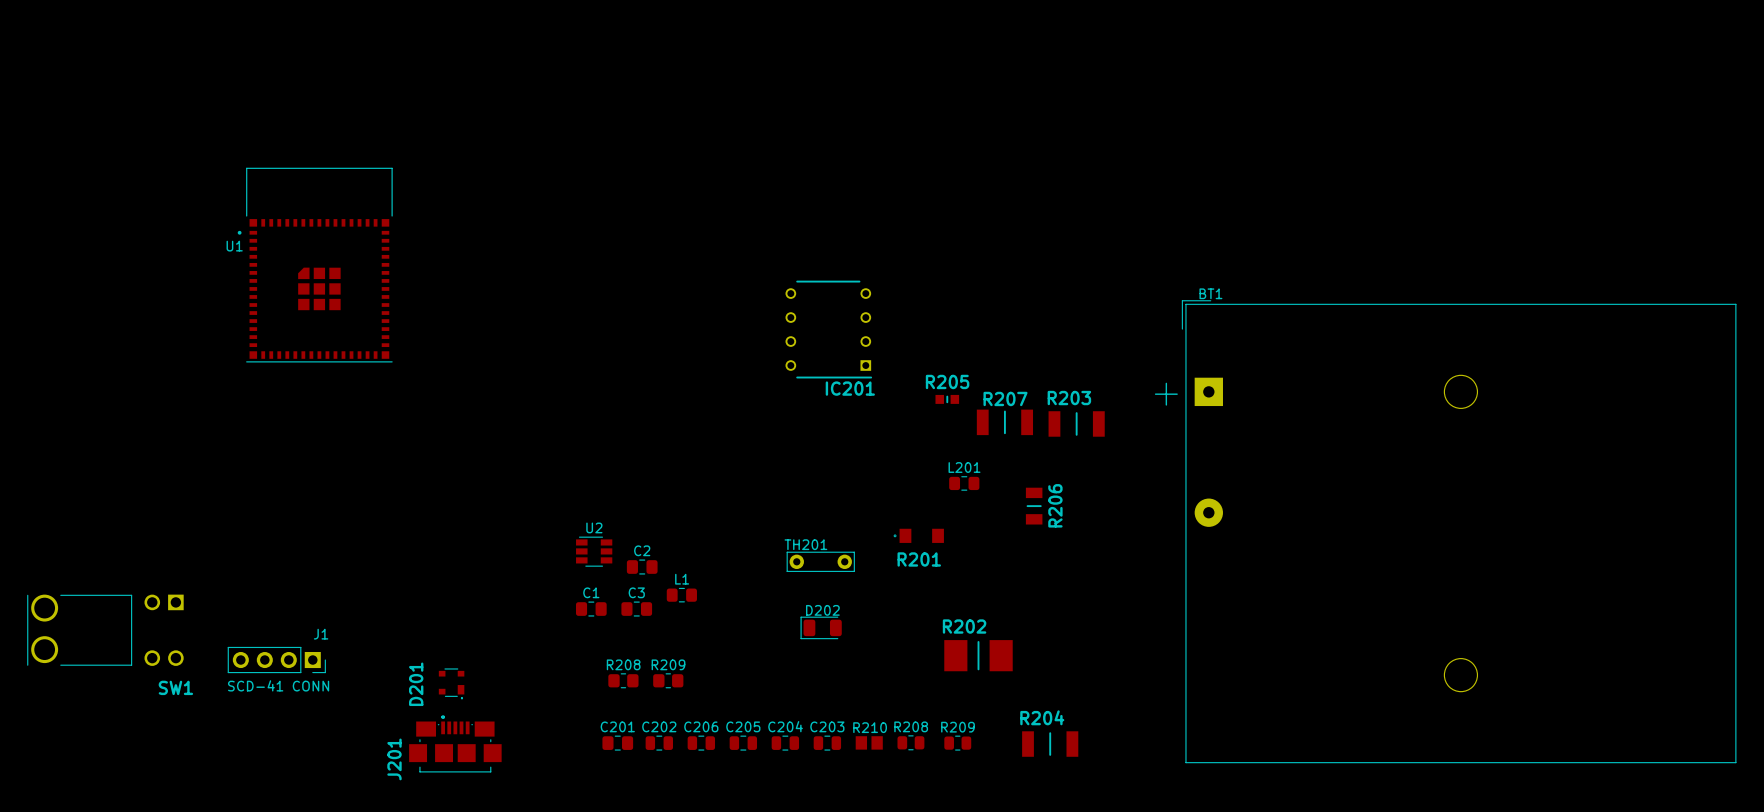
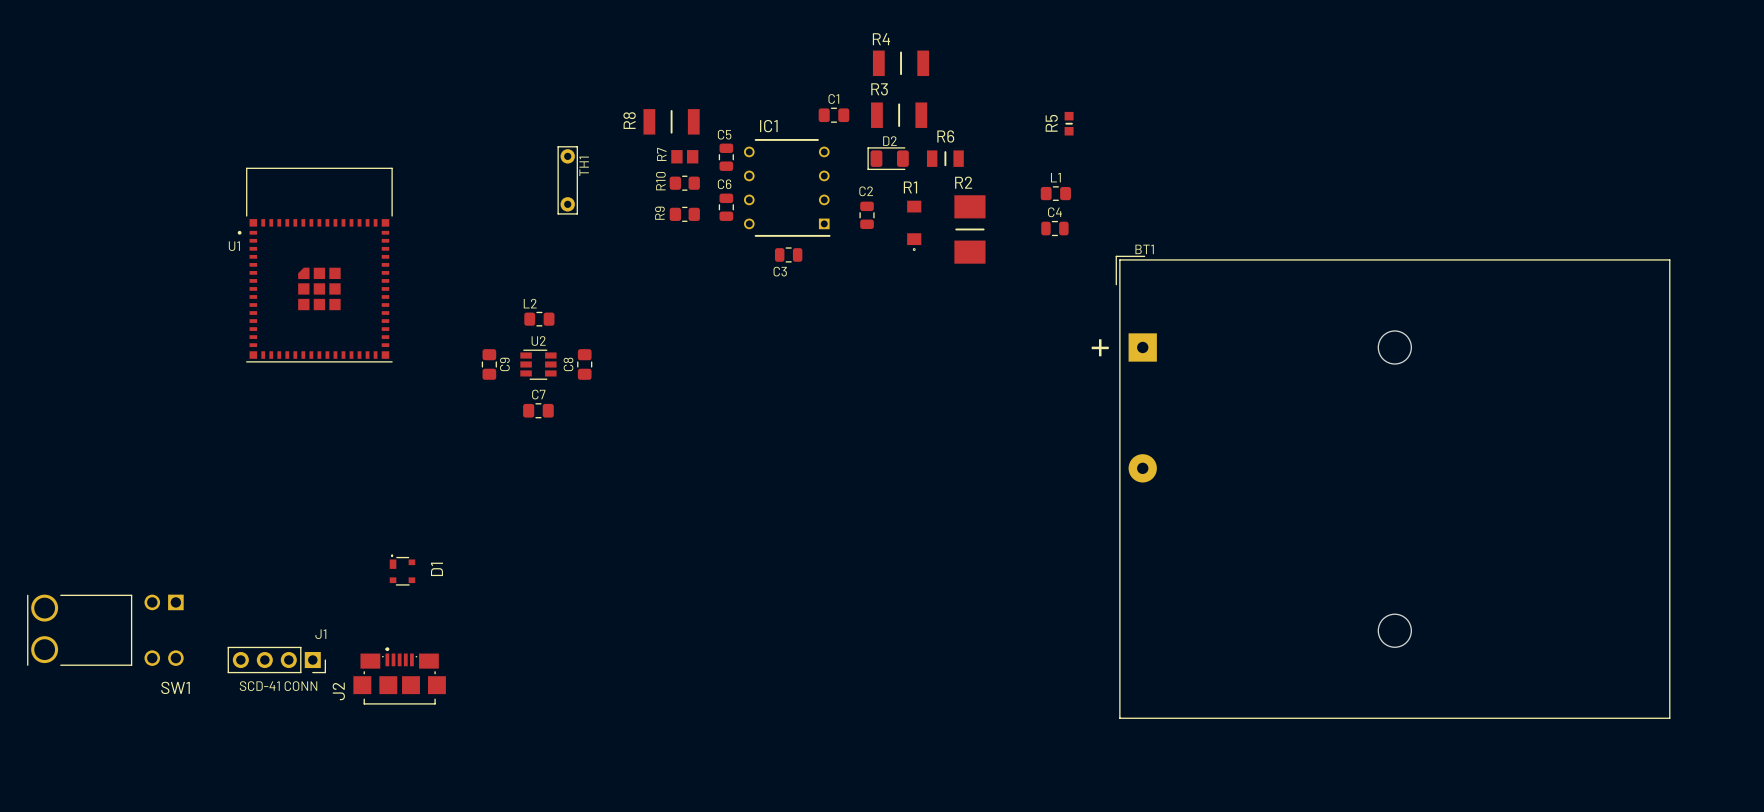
R4: none -> (901, 63)
R3: none -> (899, 115)
R8: none -> (671, 121)
R5: none -> (1069, 123)
R7: none -> (684, 156)
C5: none -> (726, 157)
D2: none -> (888, 158)
R6: none -> (945, 158)
TH1: none -> (567, 180)
R10: none -> (684, 183)
IC1: none -> (787, 187)
C6: none -> (726, 207)
R9: none -> (684, 214)
R1: none -> (914, 225)
C4: none -> (1054, 228)
R2: none -> (969, 229)
L2: none -> (539, 319)
IC201: (828, 329) -> none
C9: none -> (489, 364)
C8: none -> (584, 364)
R205: (947, 399) -> none
C7: none -> (538, 410)
R207: (1004, 422) -> none
R203: (1076, 423) -> none
L201: (964, 483) -> none
R206: (1034, 506) -> none
BT1 position: (1459, 531) -> (1393, 487)
R201: (918, 535) -> none
U2 position: (594, 551) -> (538, 364)
C2 footprint: [626, 559, 658, 575] -> [859, 201, 875, 229]
TH201: (820, 561) -> none
D1: none -> (402, 570)
C3 name position: C3 (636, 592) -> C3 (780, 271)
L1 position: (681, 595) -> (1055, 193)
C3 footprint: [621, 601, 653, 617] -> [774, 247, 803, 263]
C1 position: (591, 609) -> (833, 115)
D202: (821, 627) -> none
R202: (978, 655) -> none
J2: none -> (399, 675)
R208: (623, 680) -> none
R209: (668, 680) -> none
D201: (451, 683) -> none
R210: (869, 742) -> none
R208: (910, 742) -> none
J201: (455, 743) -> none
C201: (617, 743) -> none
C202: (659, 743) -> none
C206: (701, 743) -> none
C205: (743, 743) -> none
C204: (785, 743) -> none
C203: (827, 743) -> none
R209: (957, 743) -> none
R204: (1050, 744) -> none

